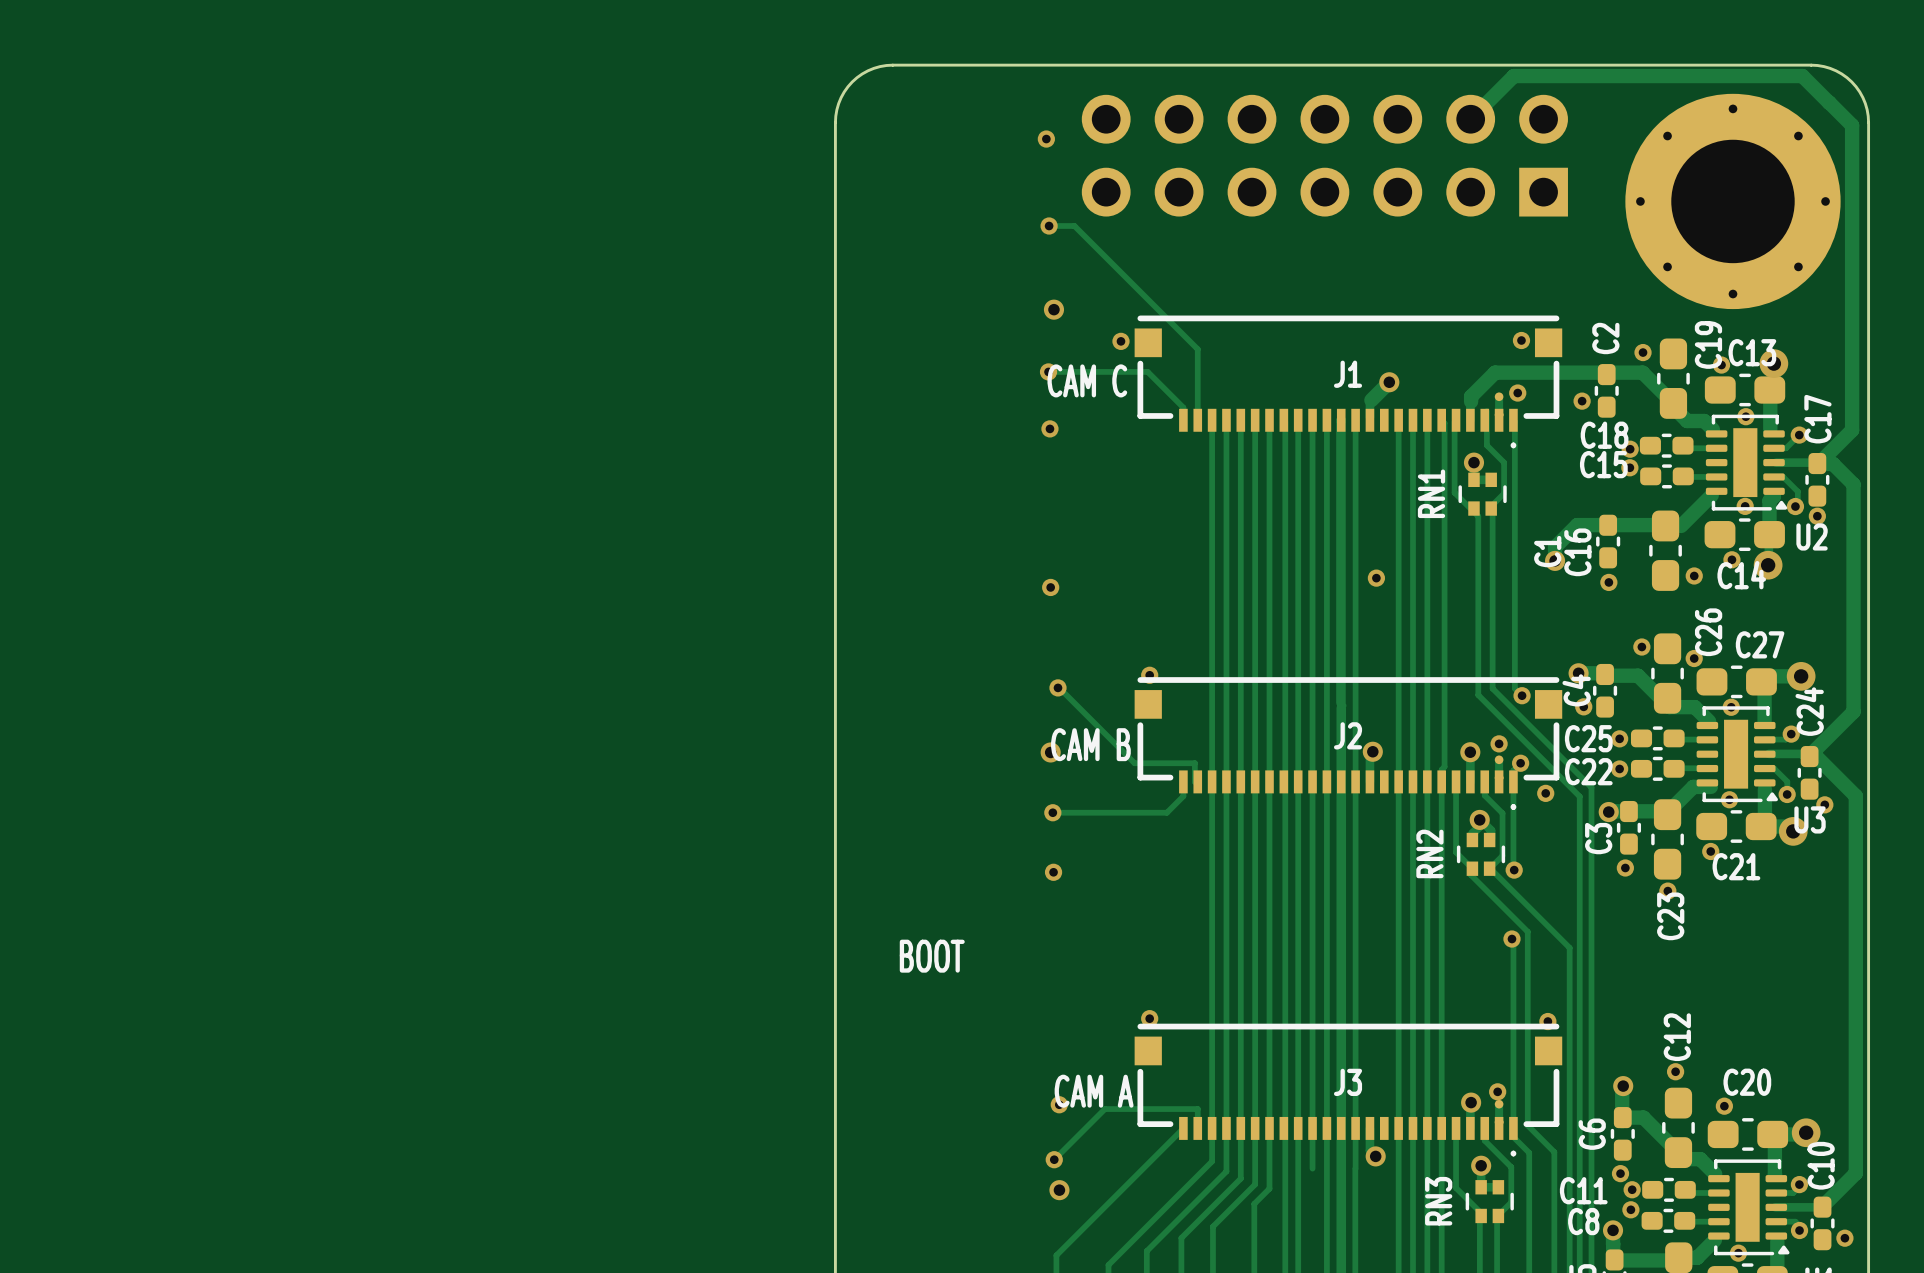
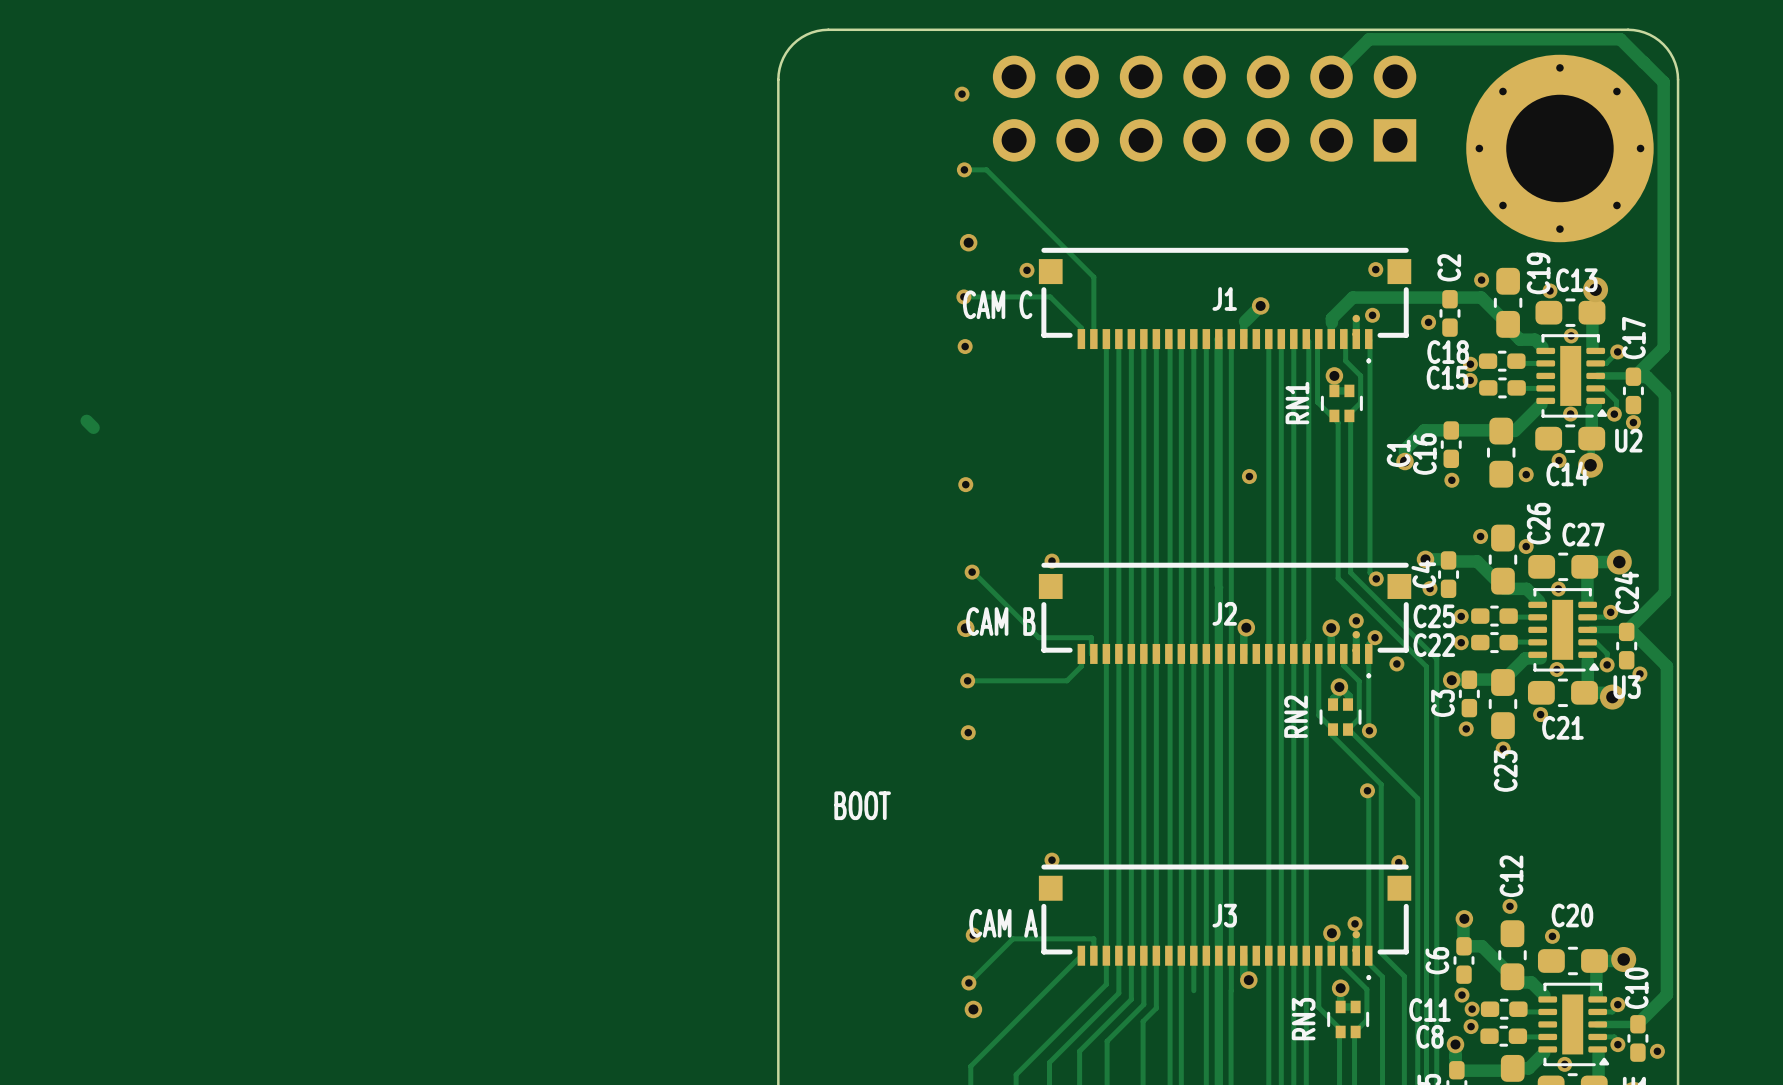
track: none -> (88, 419) (88, 422) (93, 427) (86, 420)

